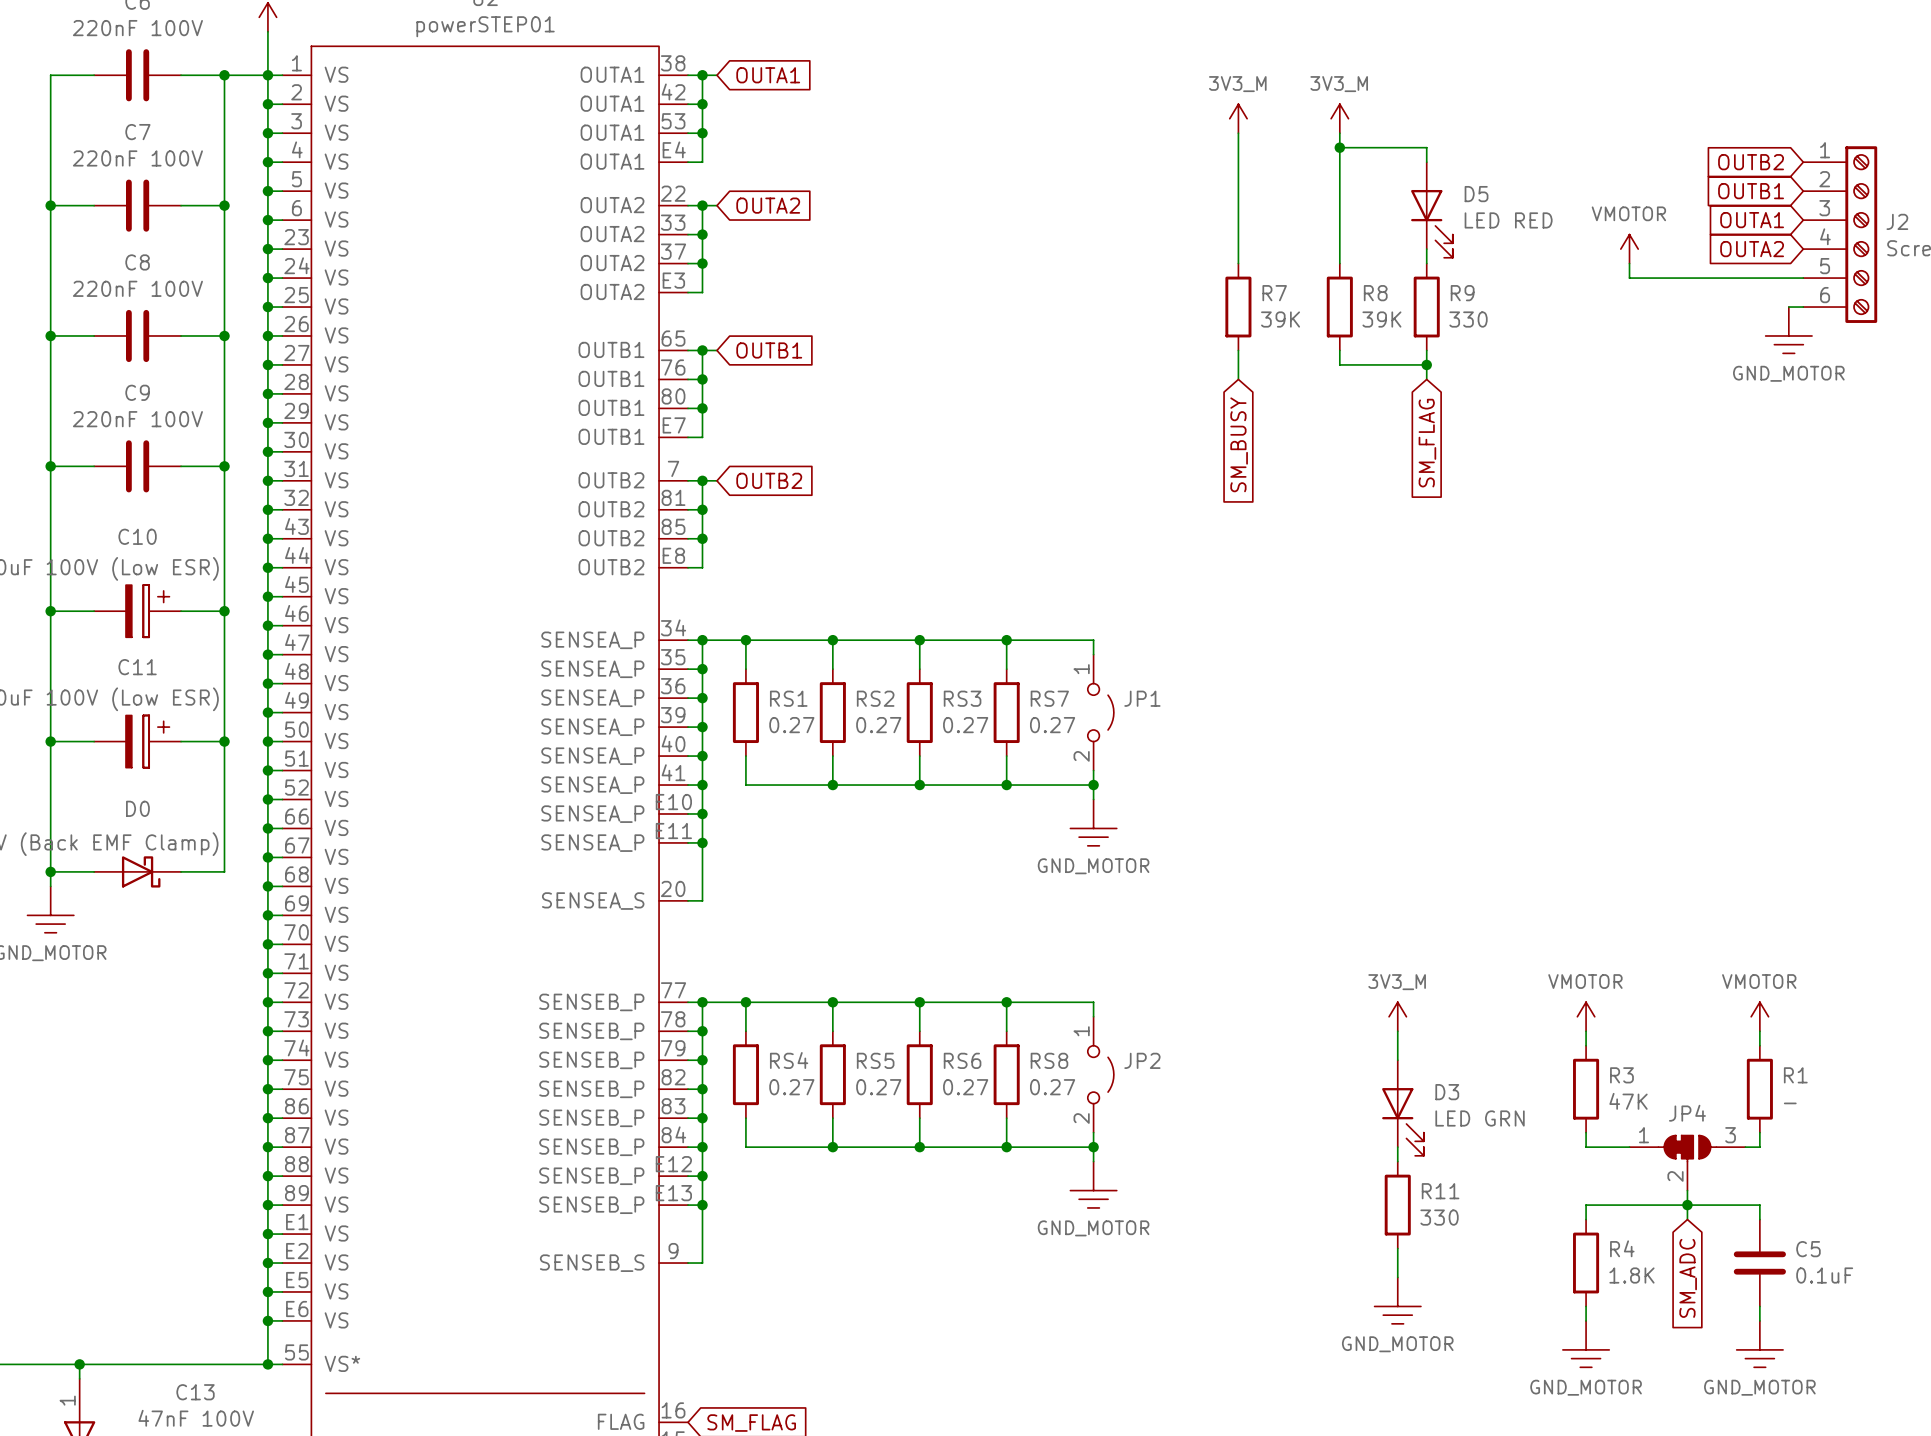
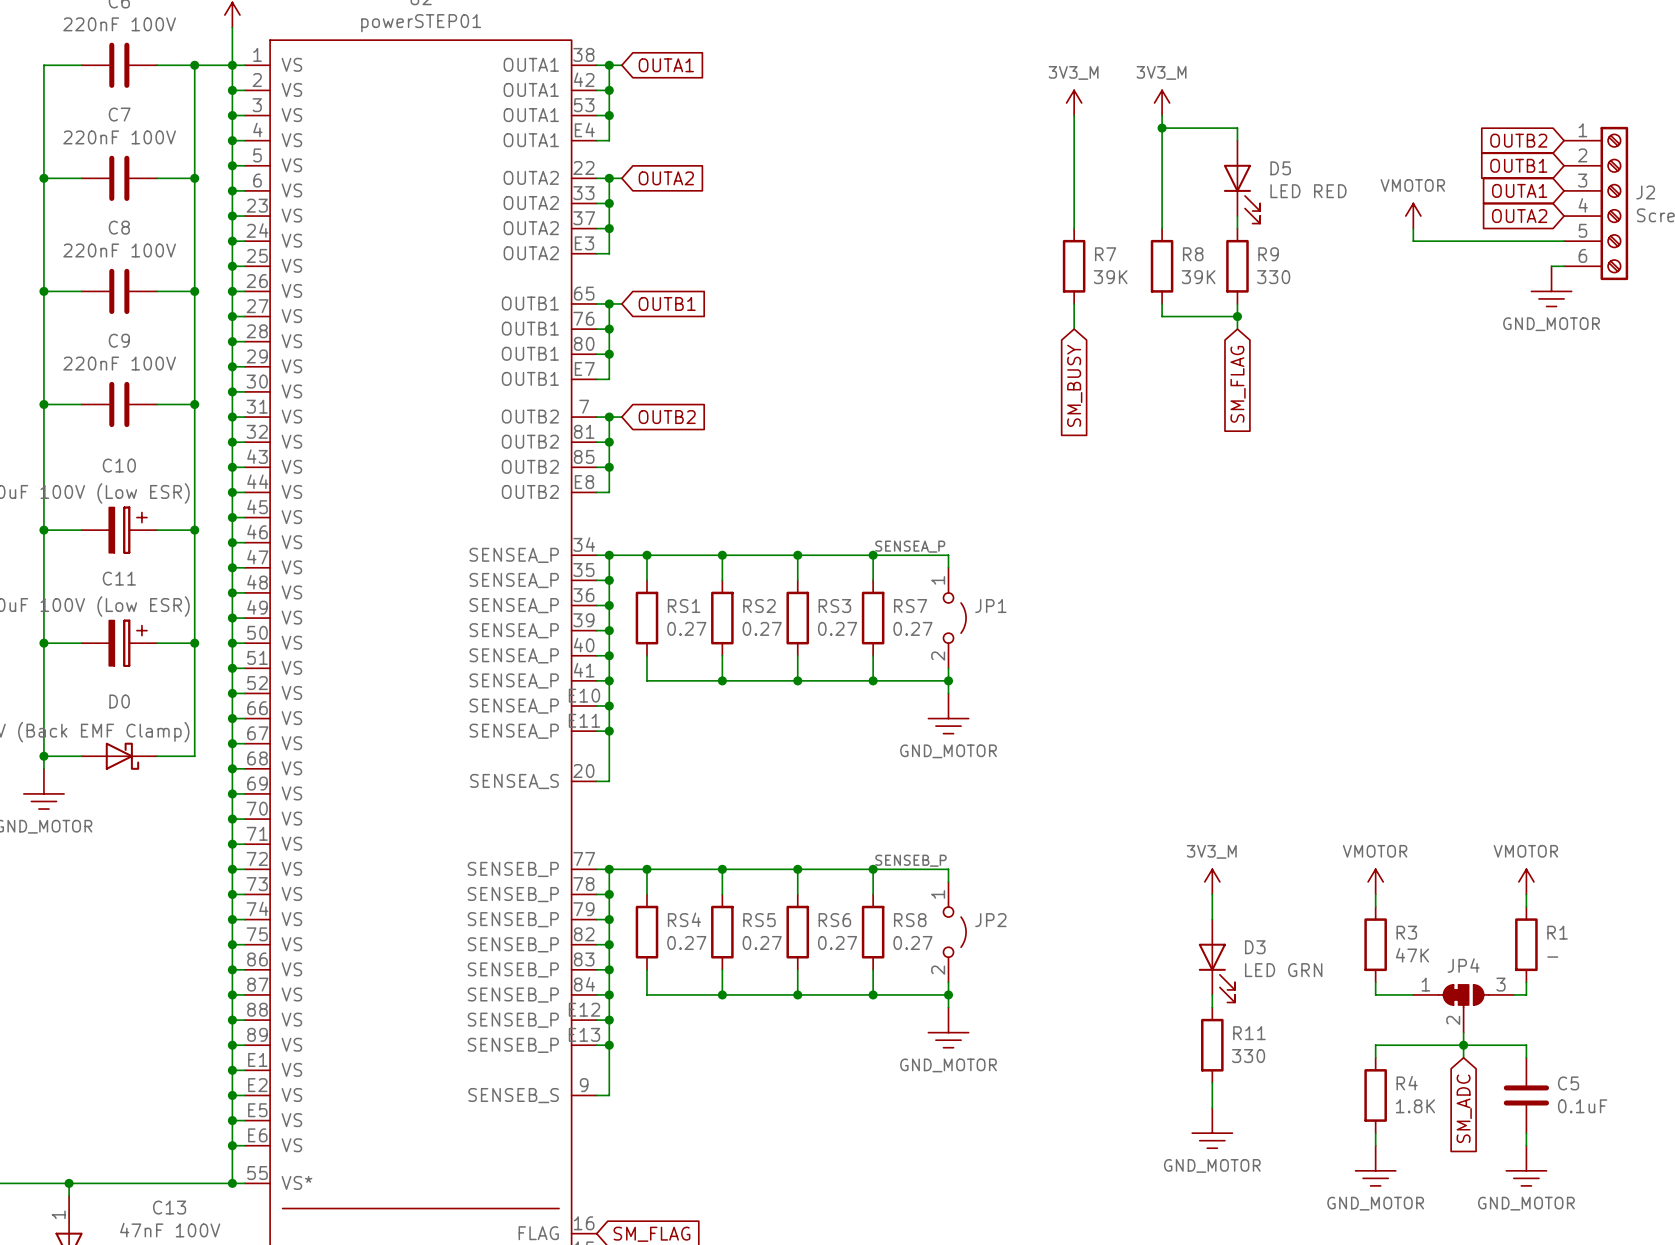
label: none -> SENSEA_P (910, 546)
label: none -> SENSEB_P (910, 860)

